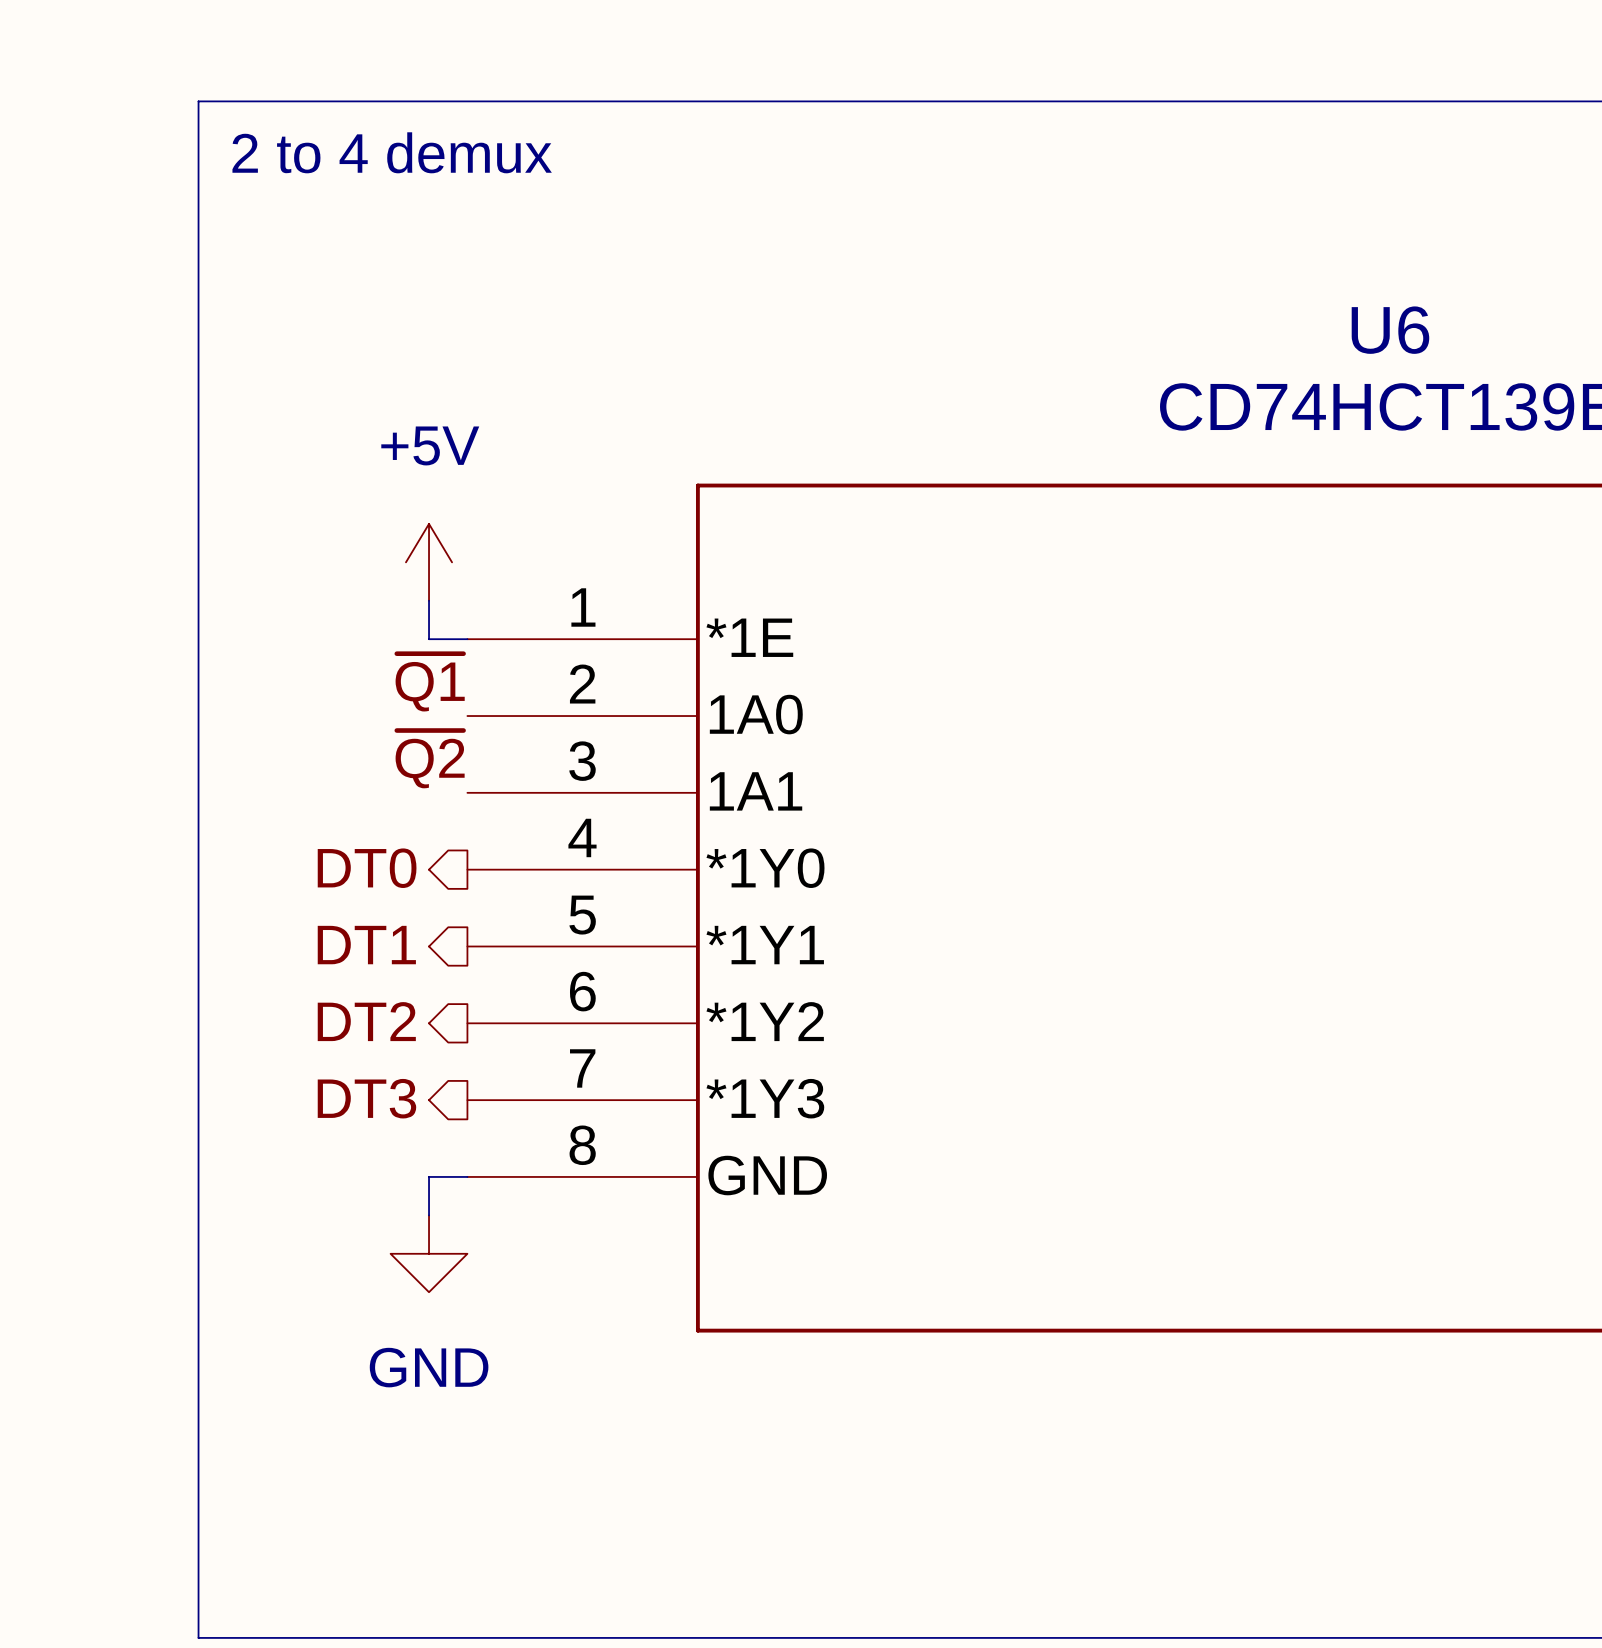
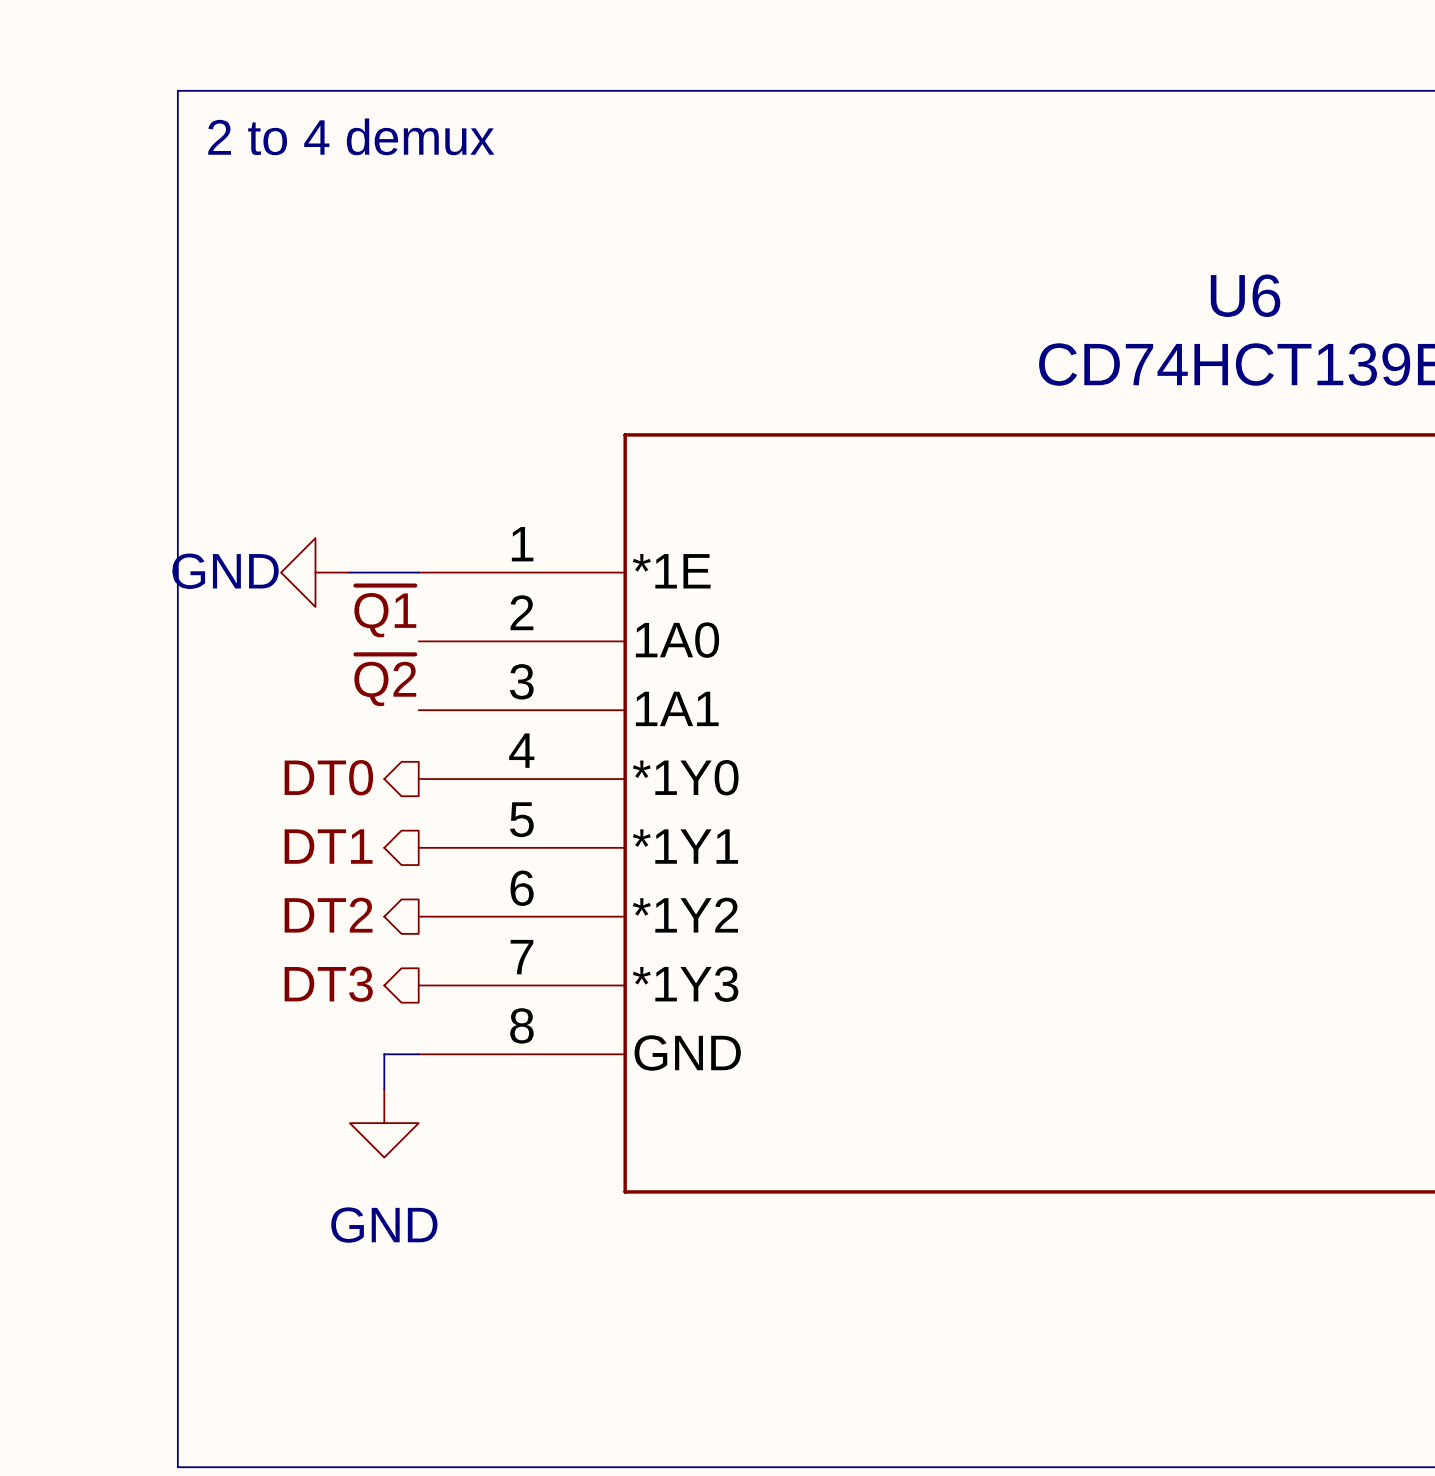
power symbol: +5V (429, 562) -> none
wire: (429, 600) (429, 639) -> (349, 572) (384, 572)
power symbol: none -> GND (315, 572)

